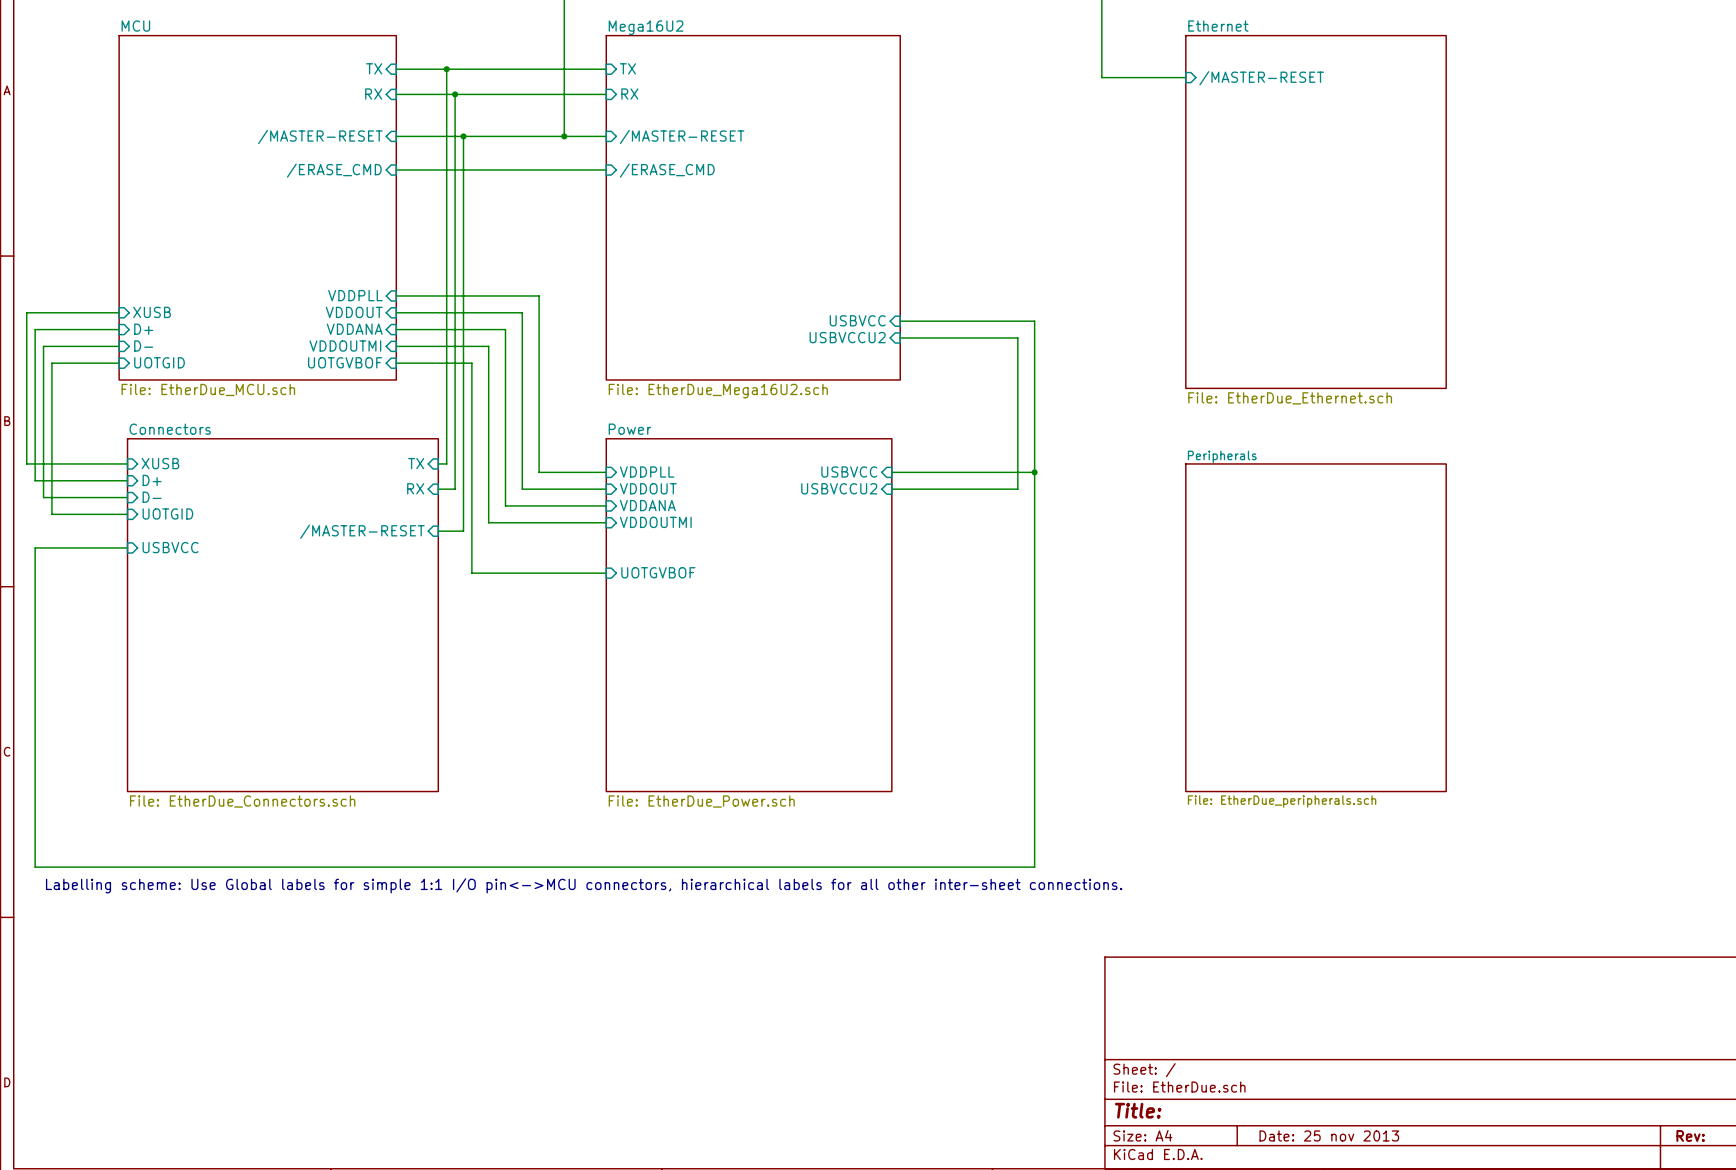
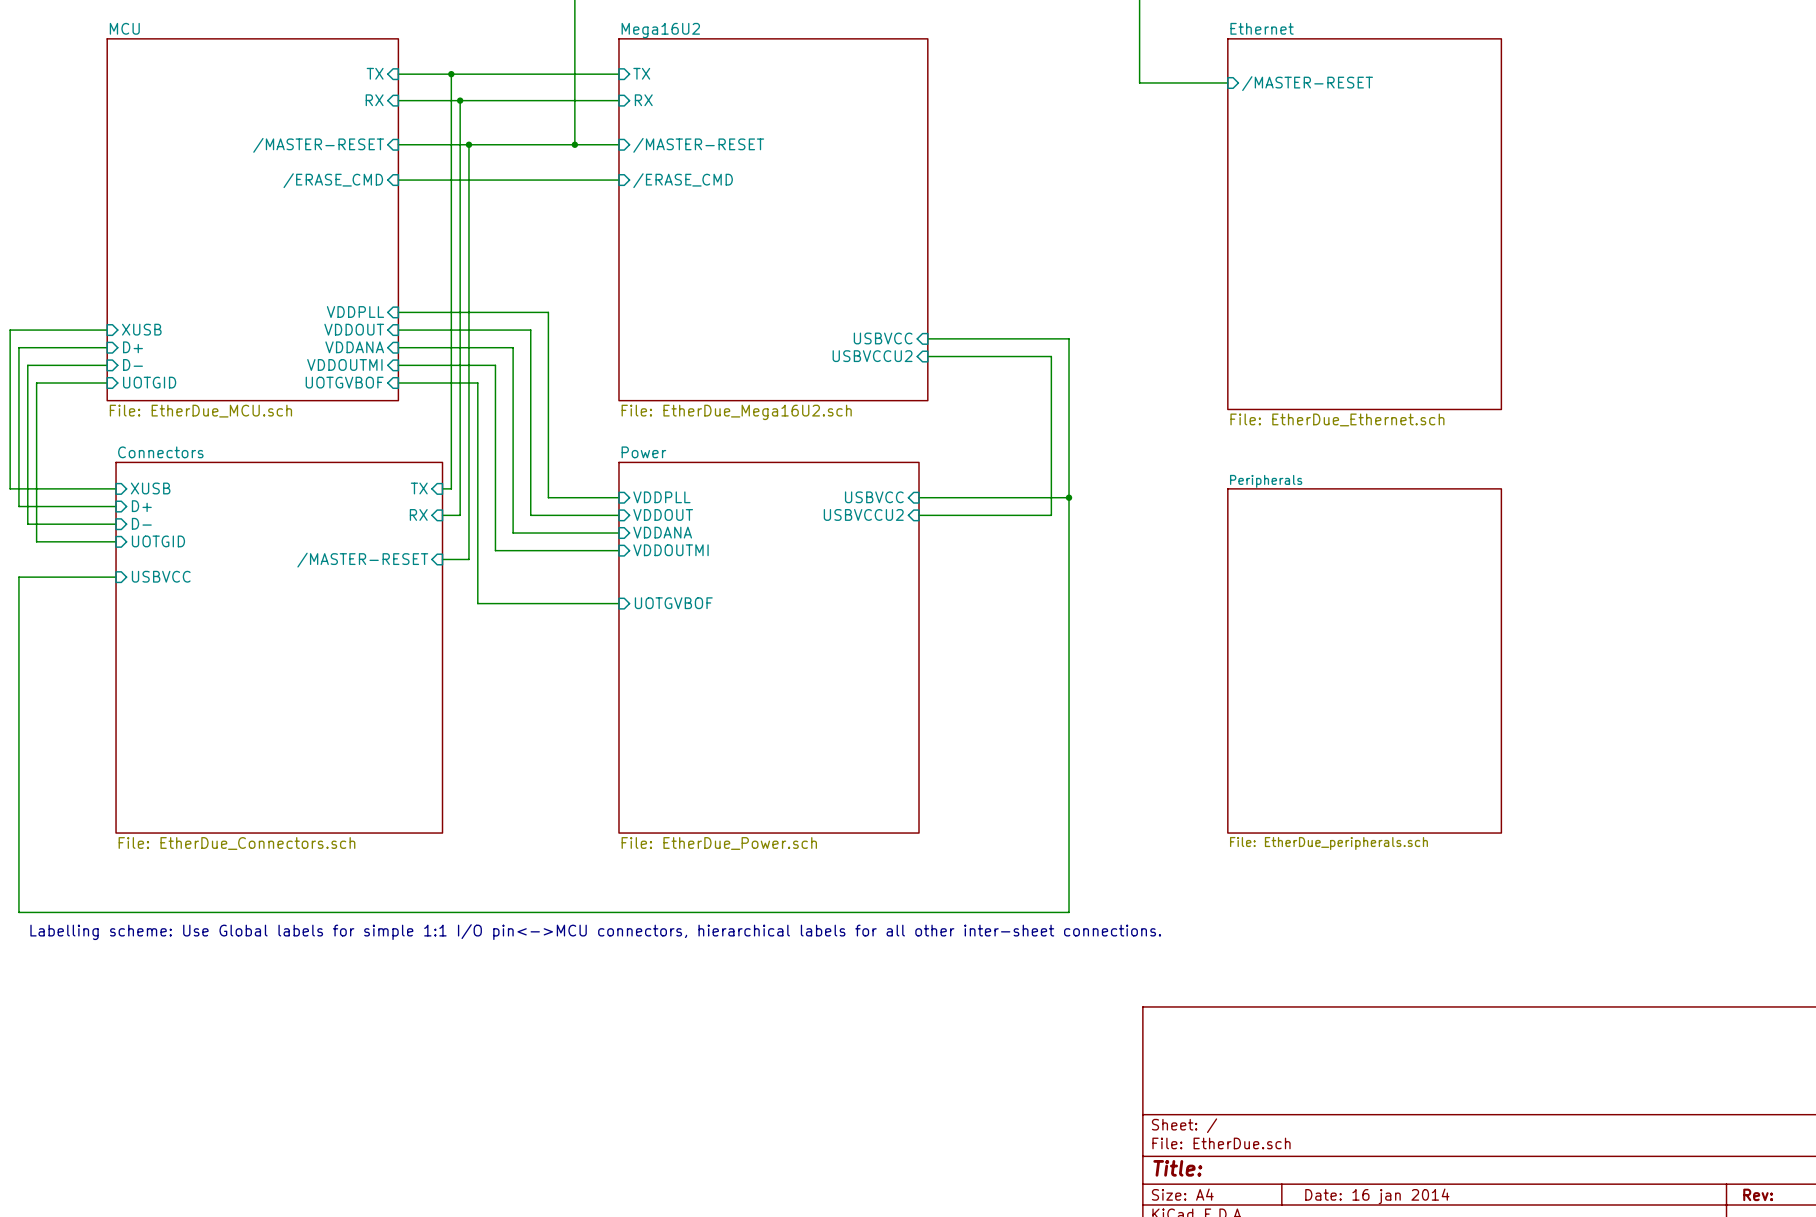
title block: Date: 25 nov 2013 (1329, 1135) -> Date: 16 jan 2014 (1377, 1196)

